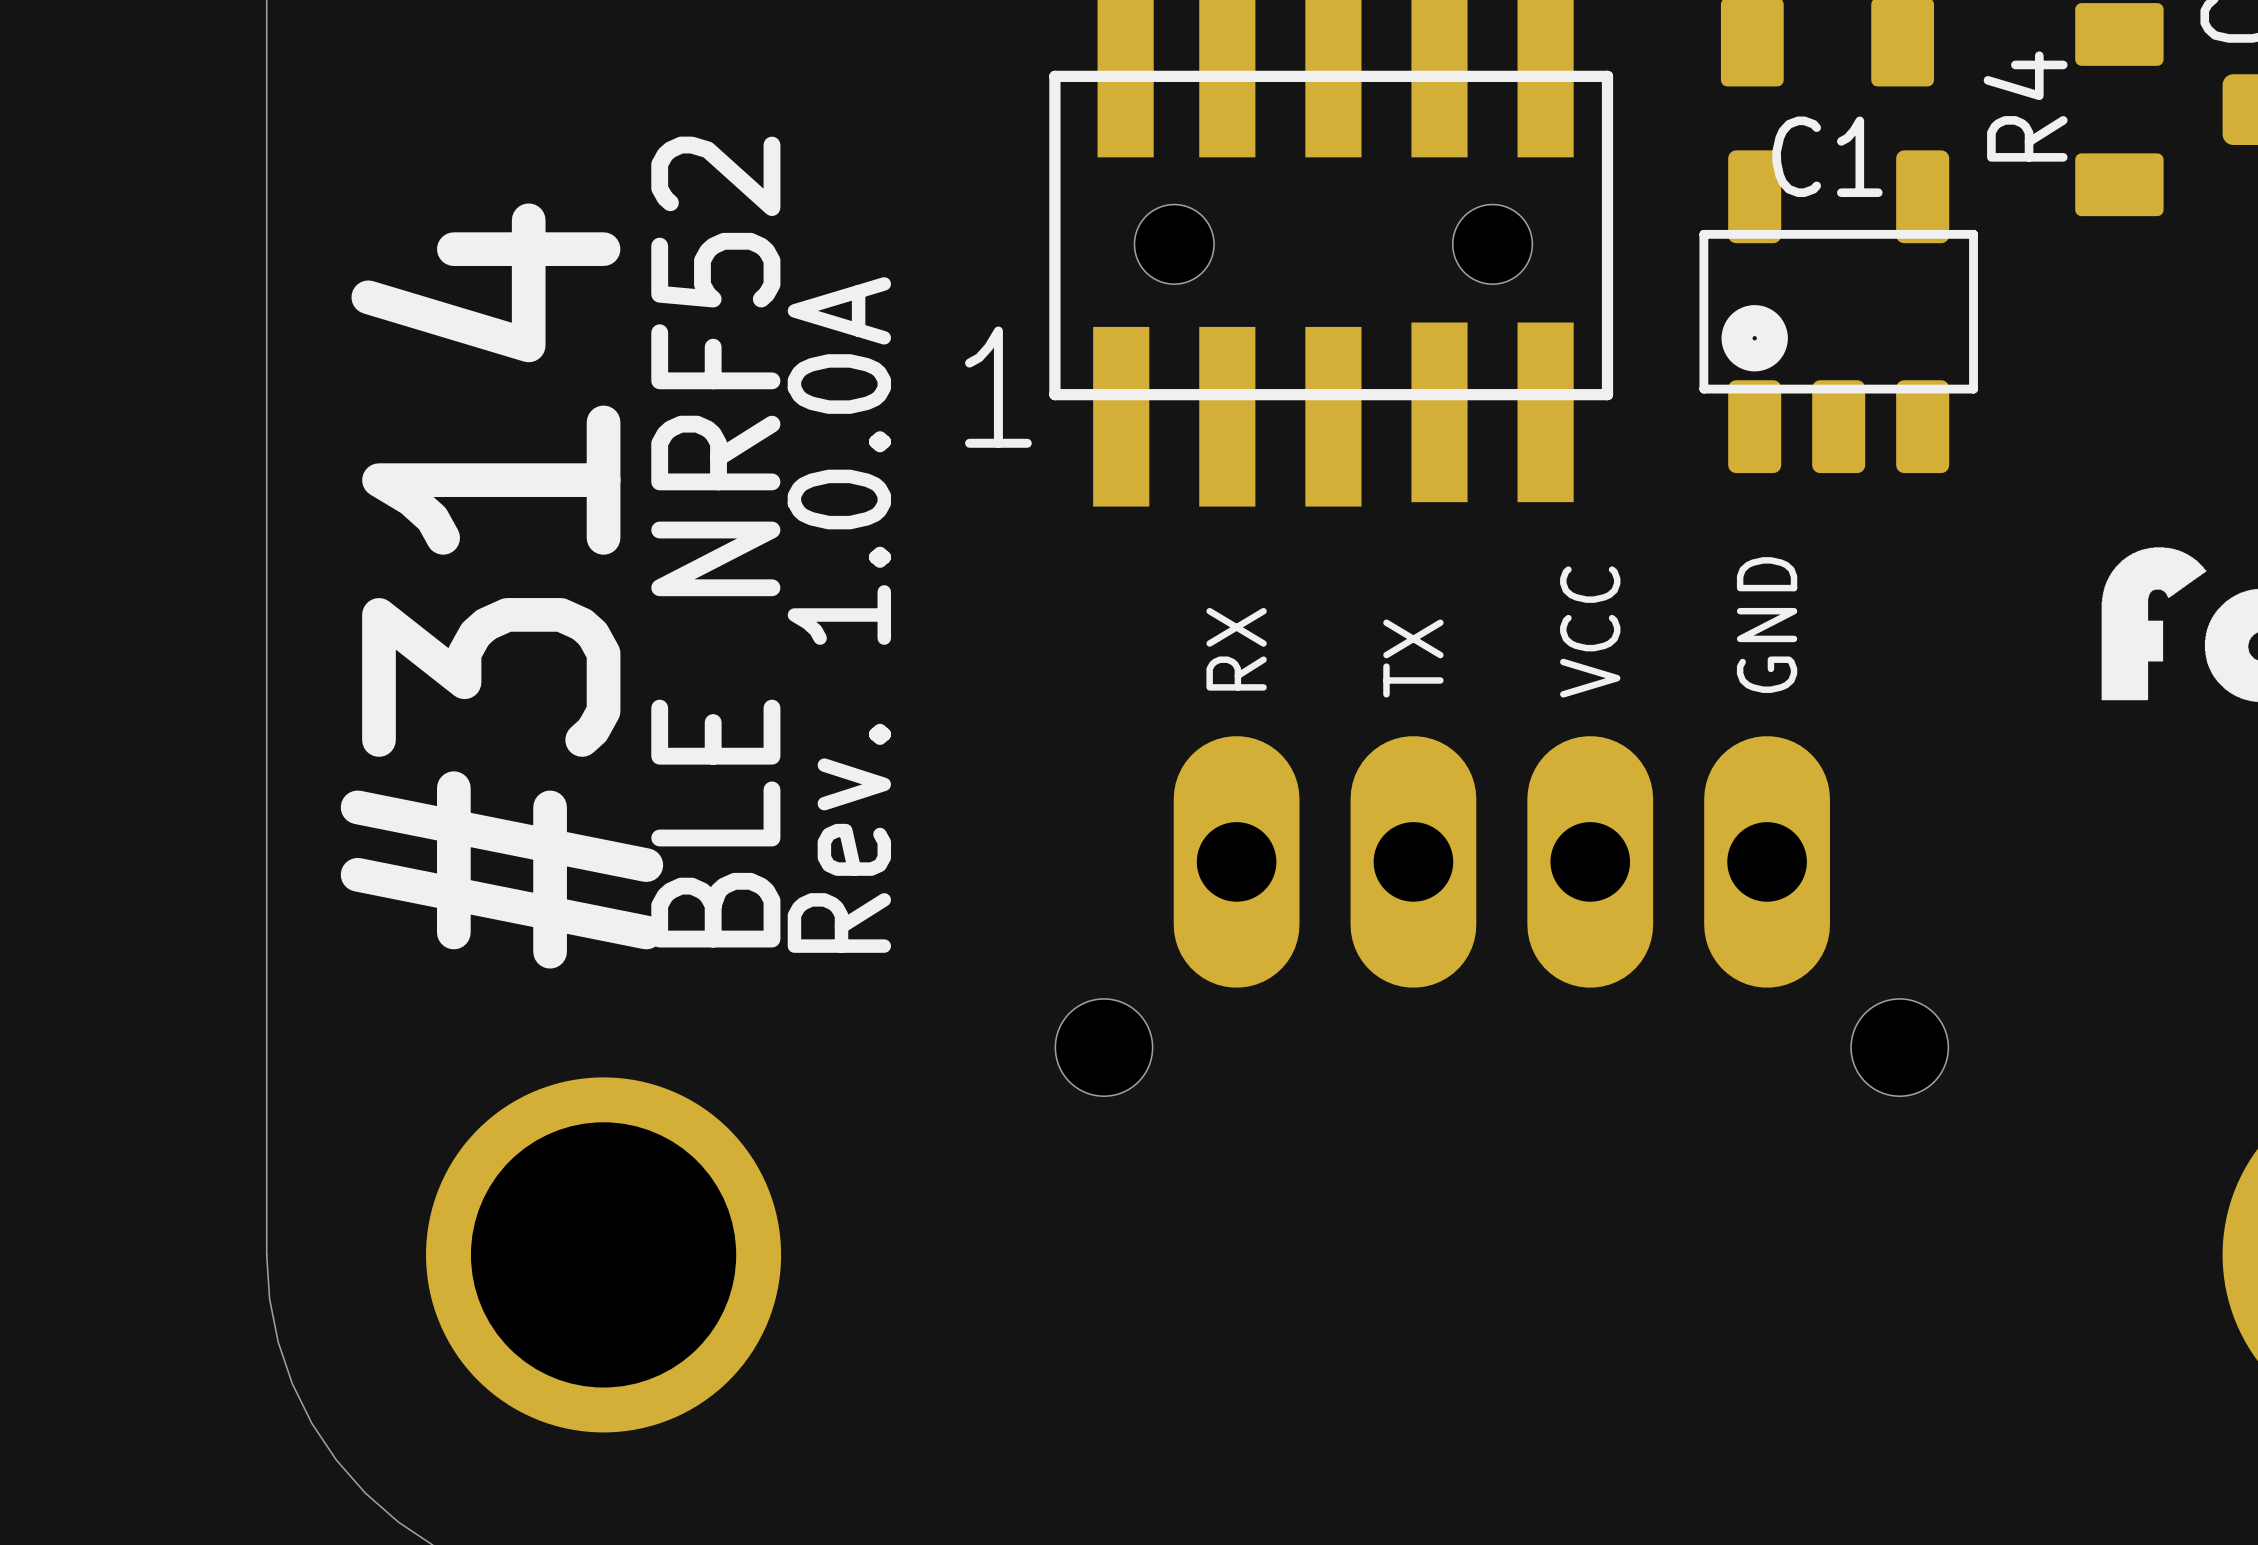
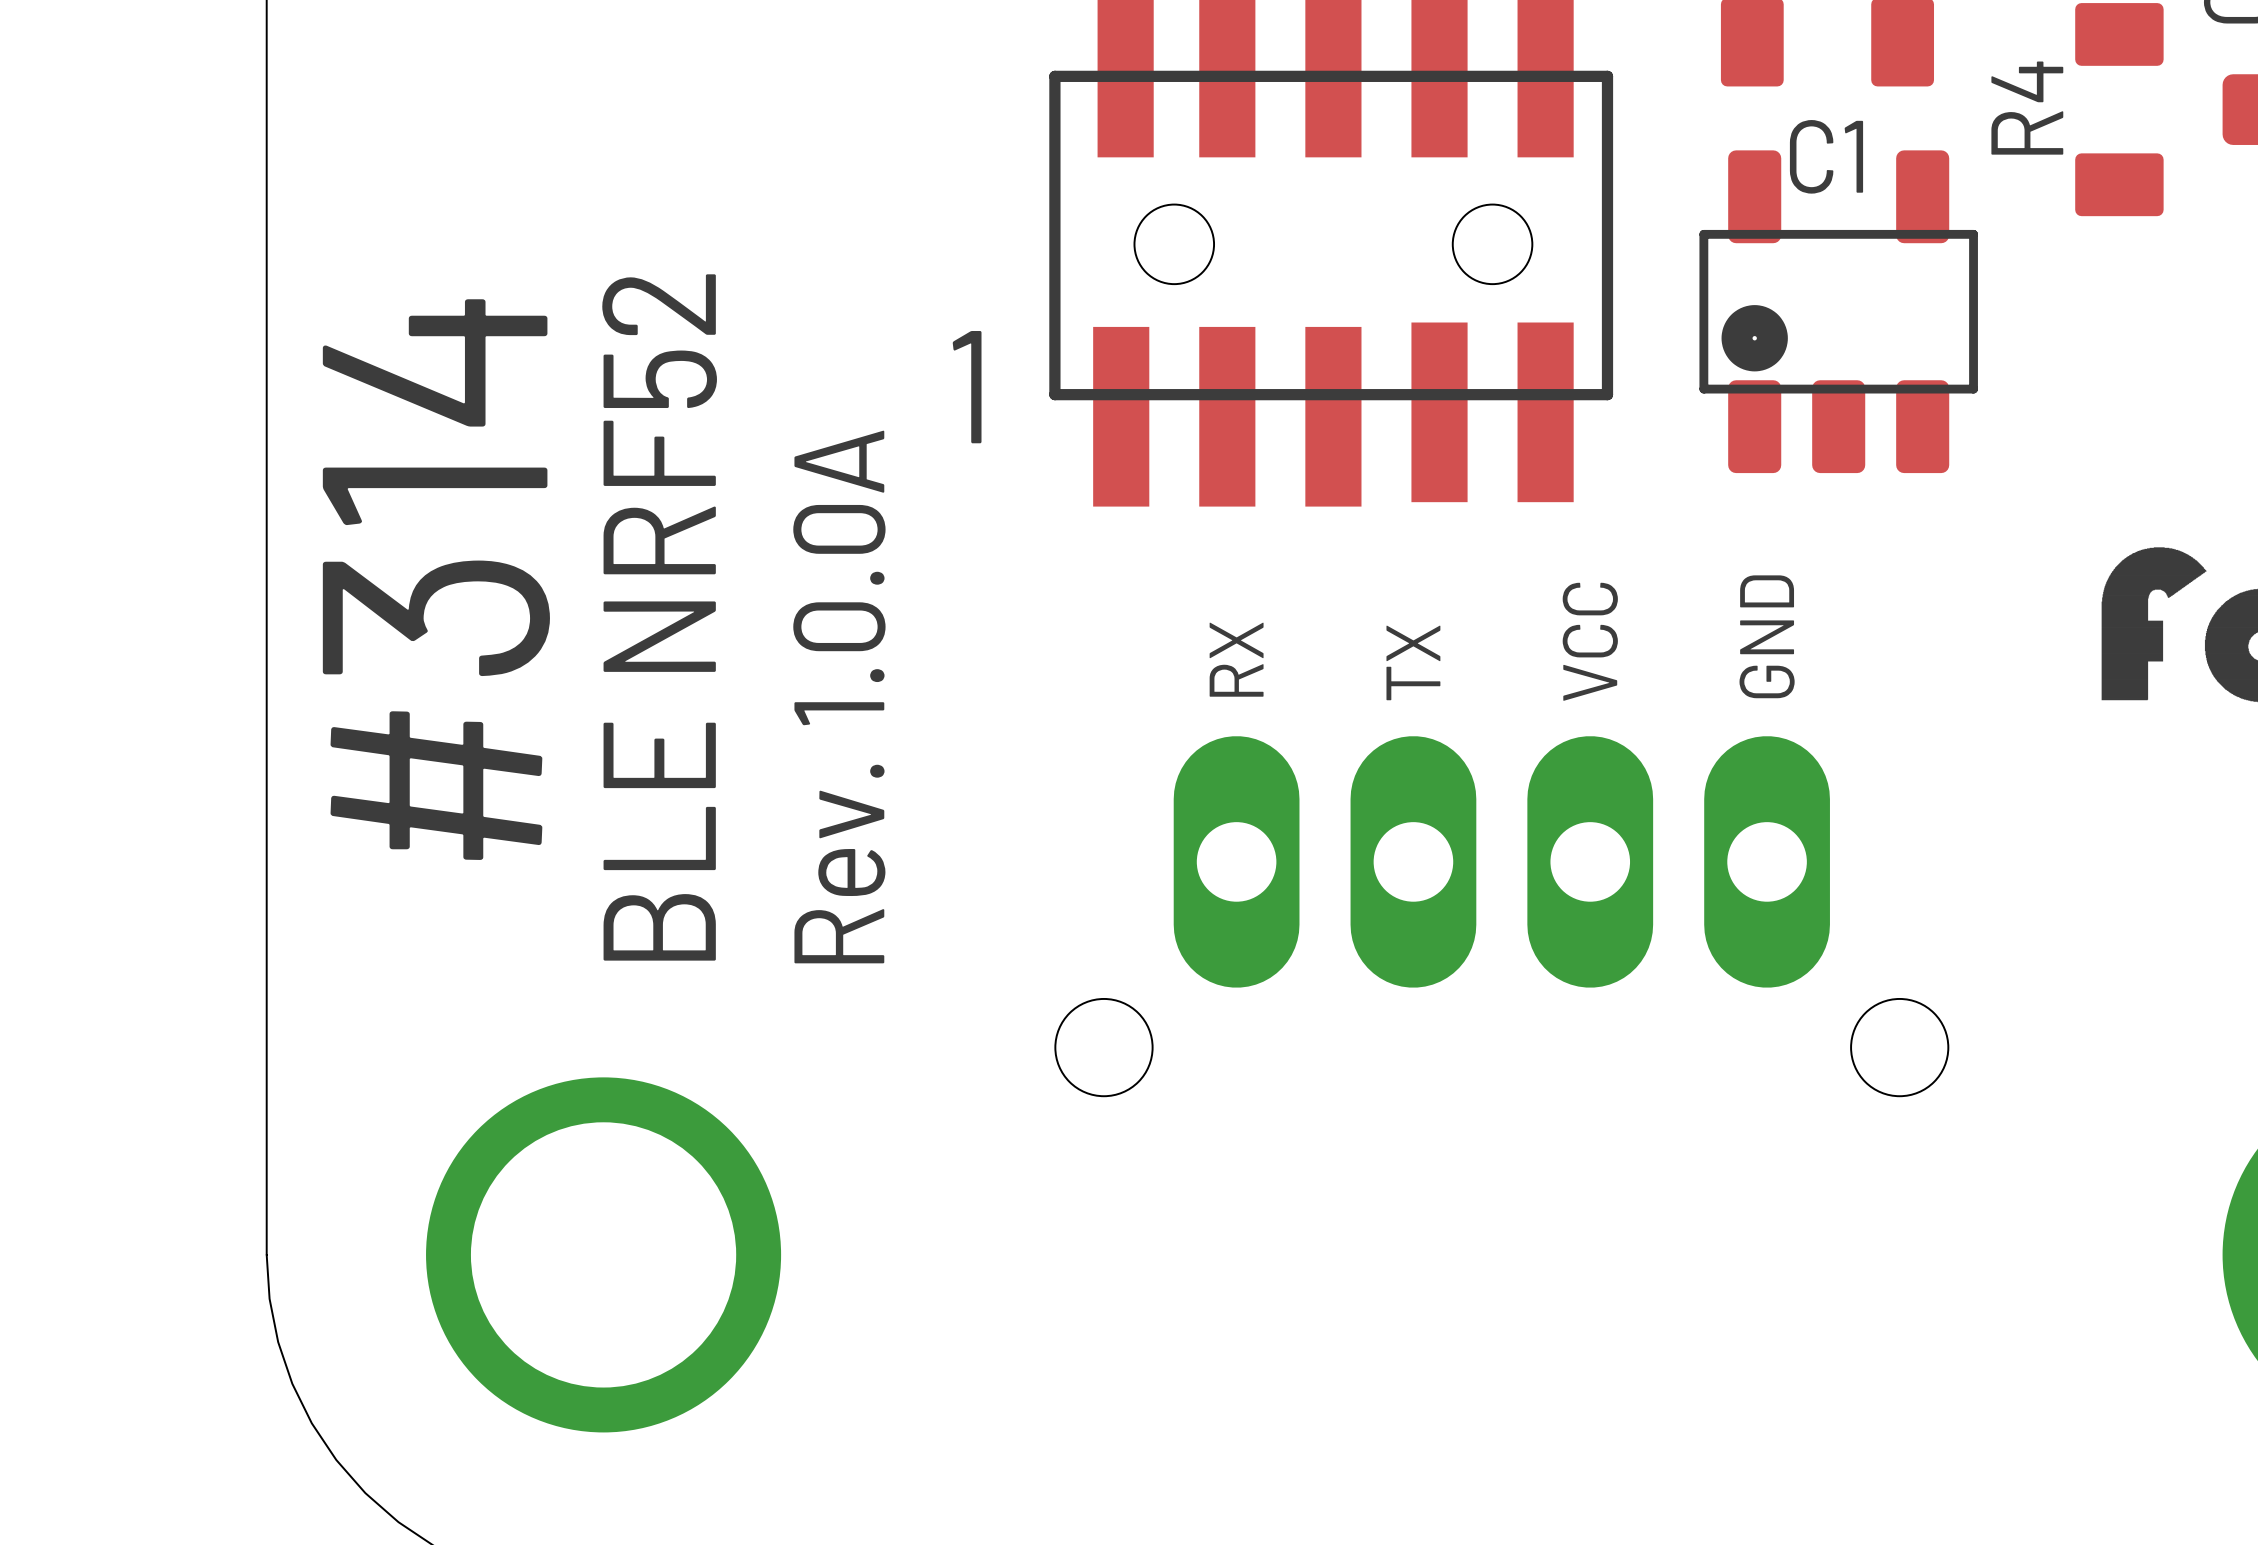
text position: BLE NRF52 (715, 542) -> BLE NRF52 (659, 617)
text position: #314 (501, 586) -> #314 (436, 579)

